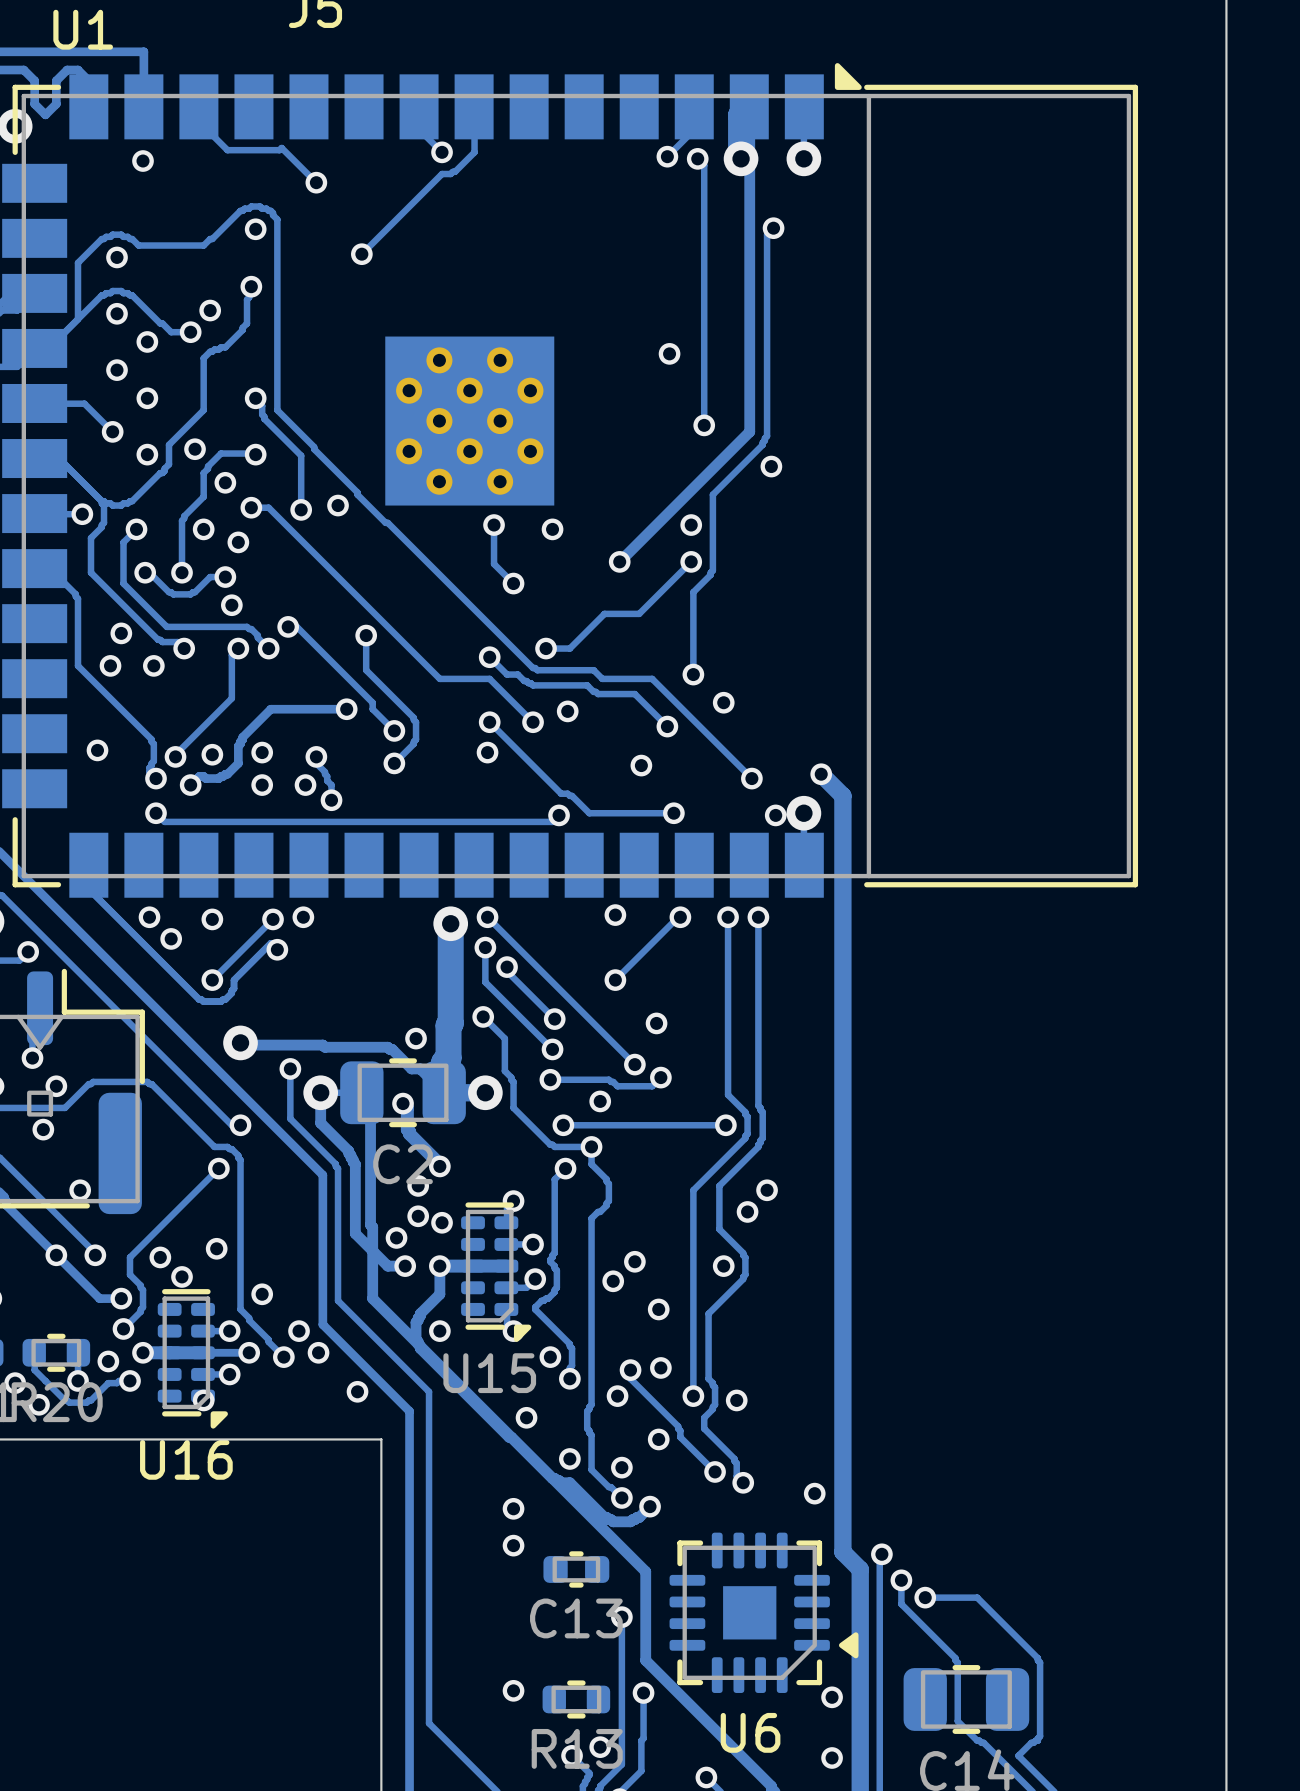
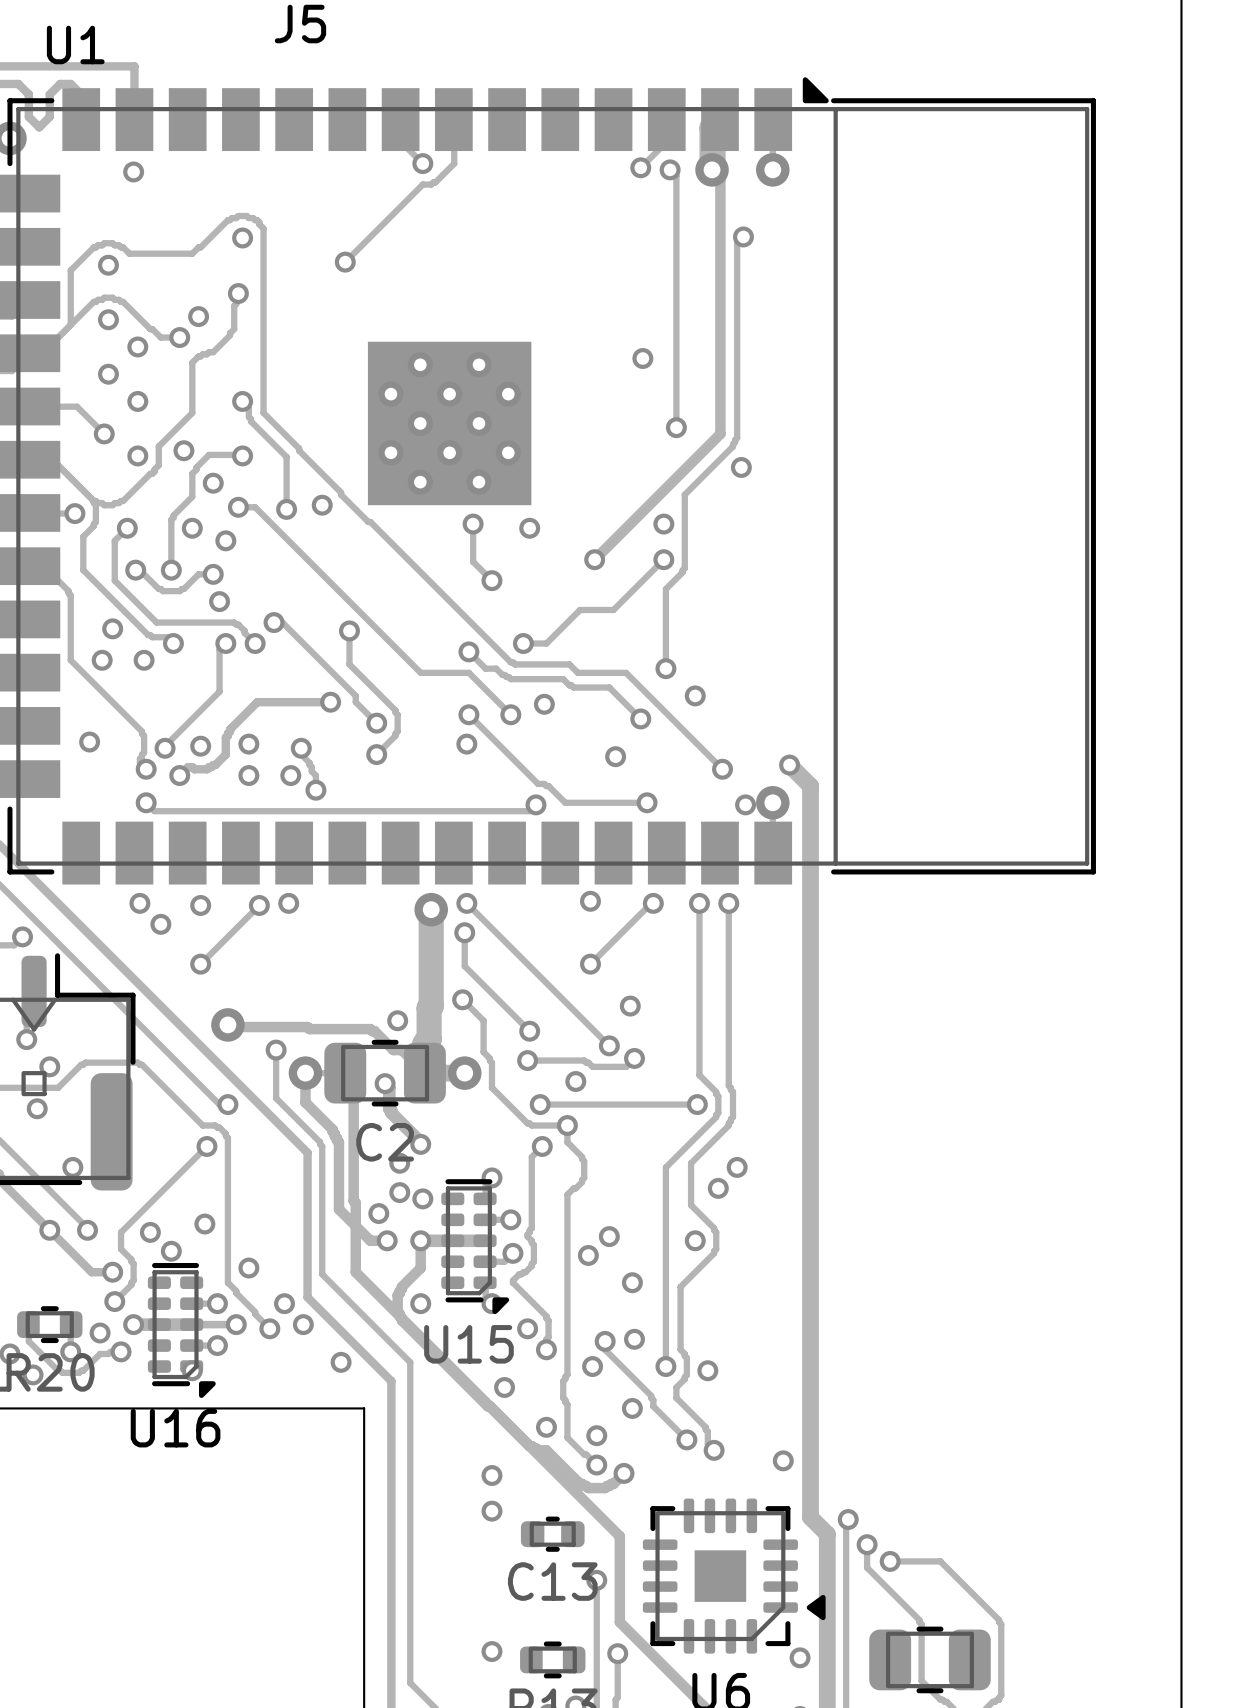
track: (199, 106) (199, 122) (227, 150) (279, 150) (281, 148) (316, 182) -> none
via: (316, 182) -> none
track: (88, 865) (88, 889) (203, 1001) (221, 1001) (225, 999) (234, 988) (234, 980) (270, 943) (277, 949) -> none
via: (277, 949) -> none
track: (507, 967) (507, 971) (554, 1019) -> none
via: (507, 967) -> none
via: (554, 1019) -> none

